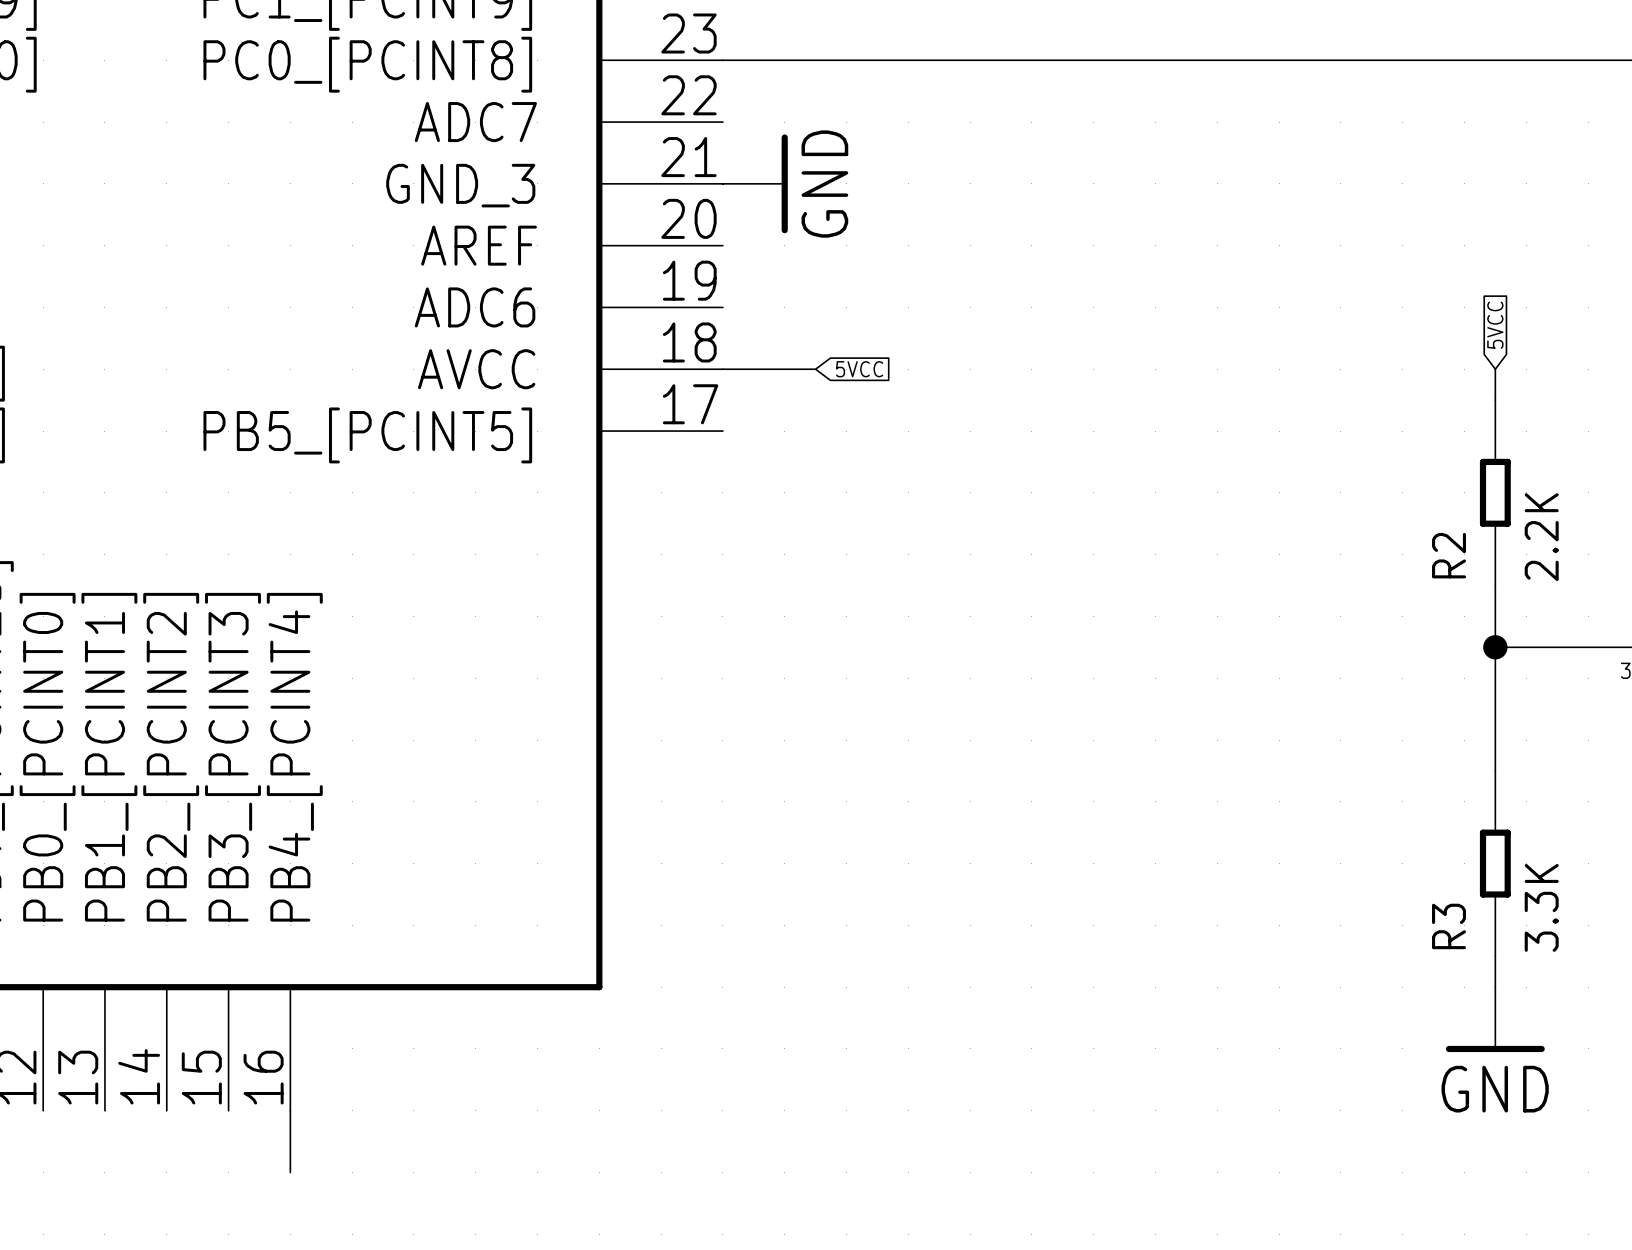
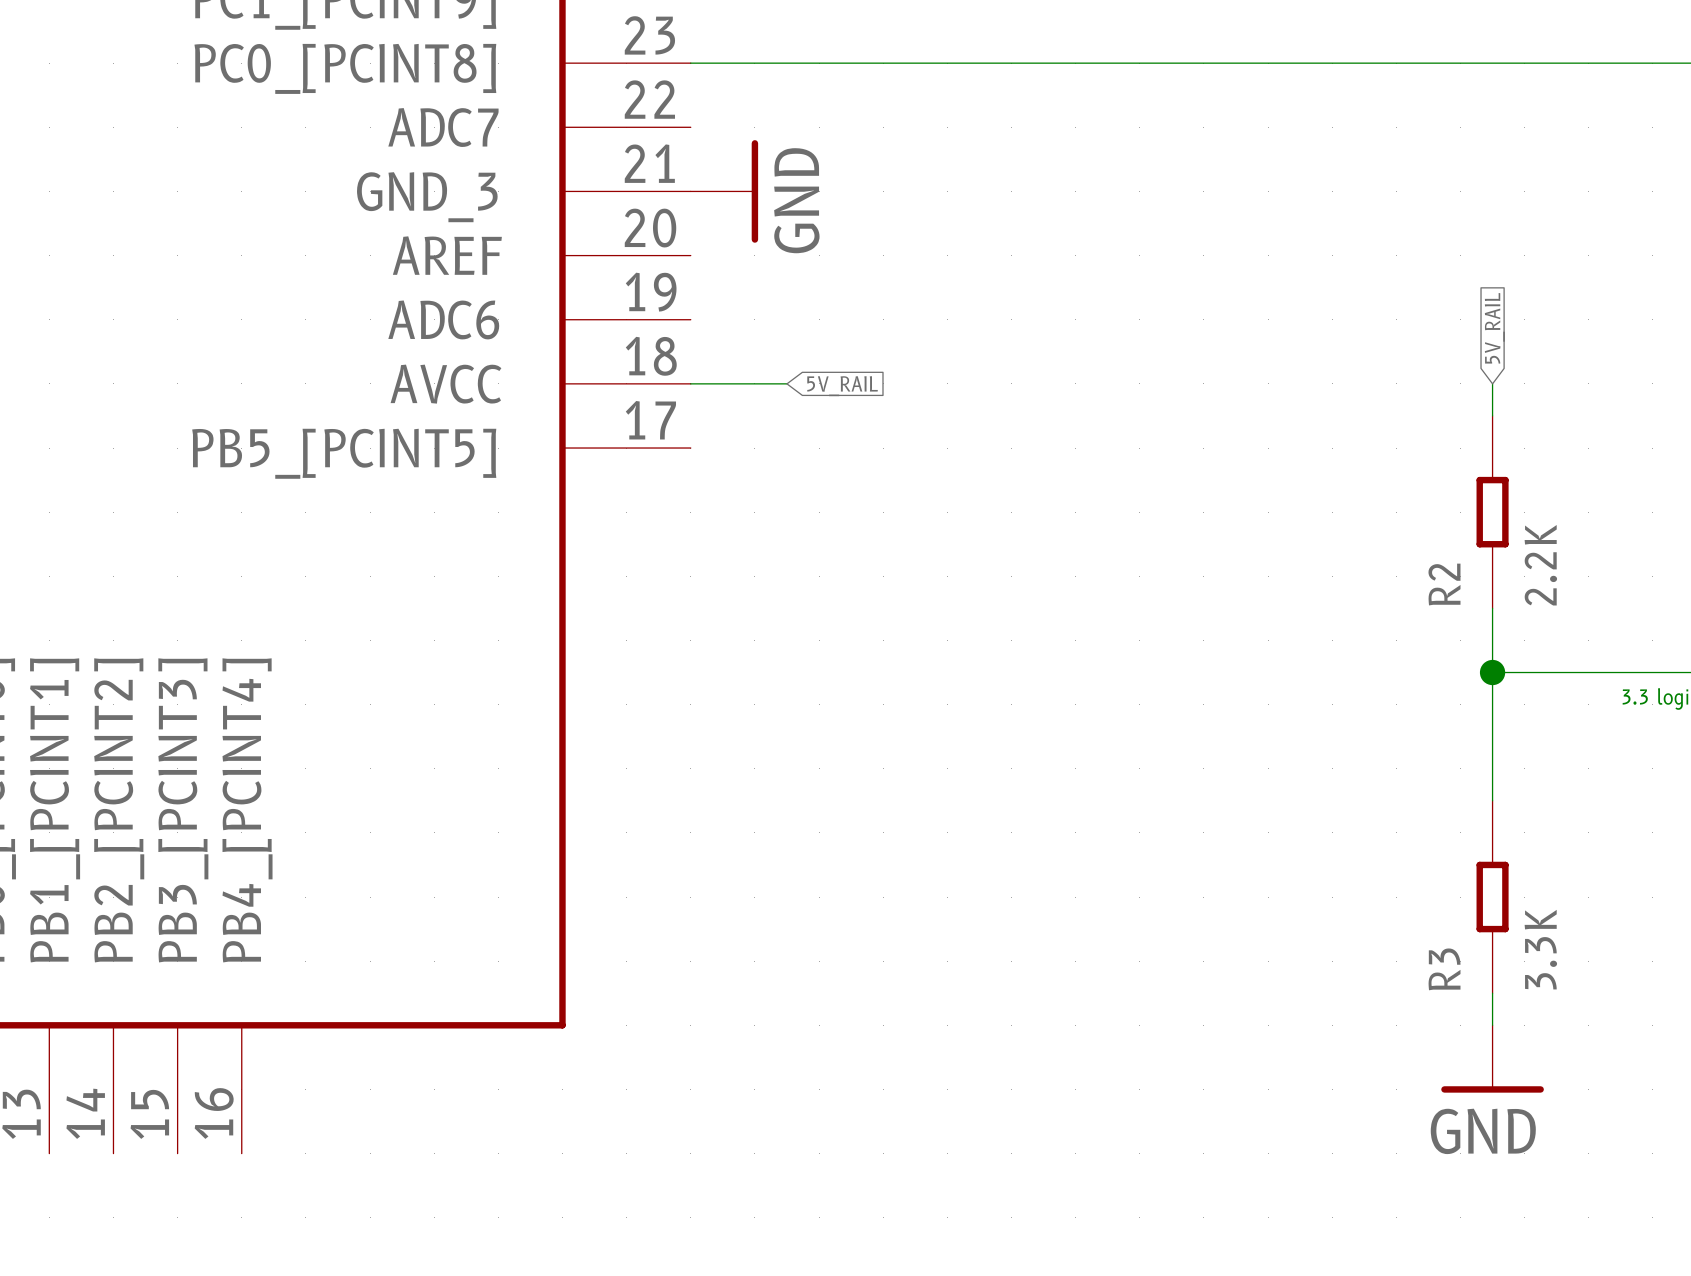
global label: 5VCC (1495, 325) -> 5V_RAIL (1494, 328)
global label: 5VCC (859, 369) -> 5V_RAIL (842, 386)
wire: (290, 1110) (290, 1172) -> none

